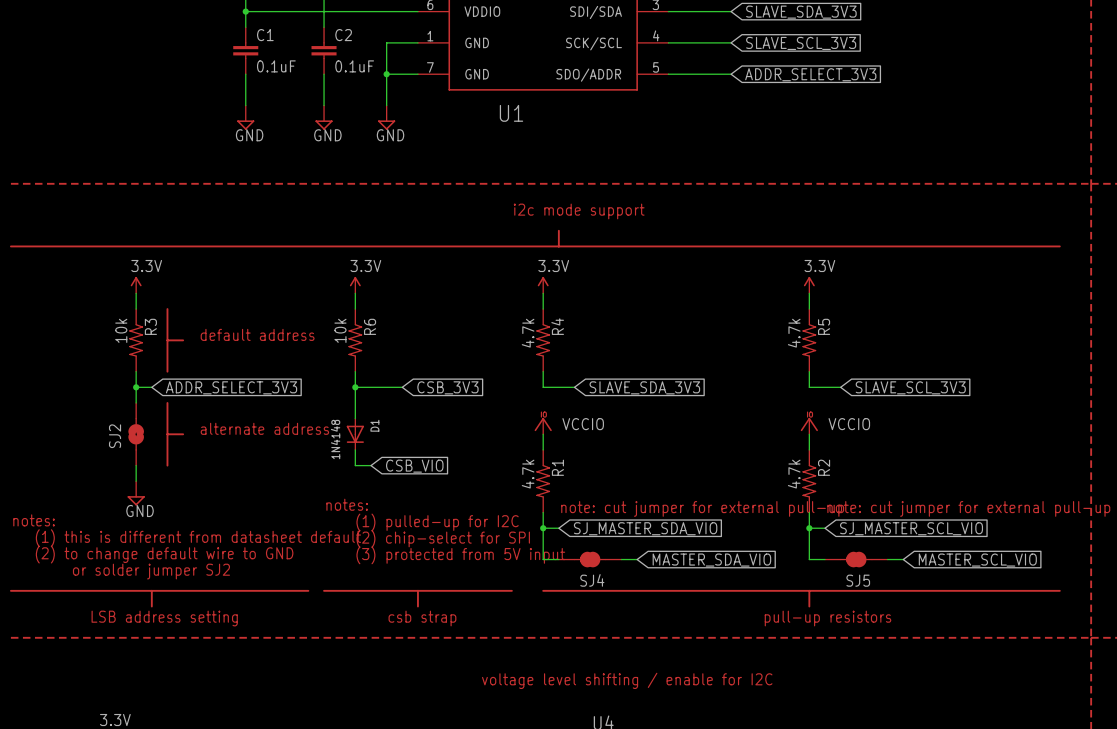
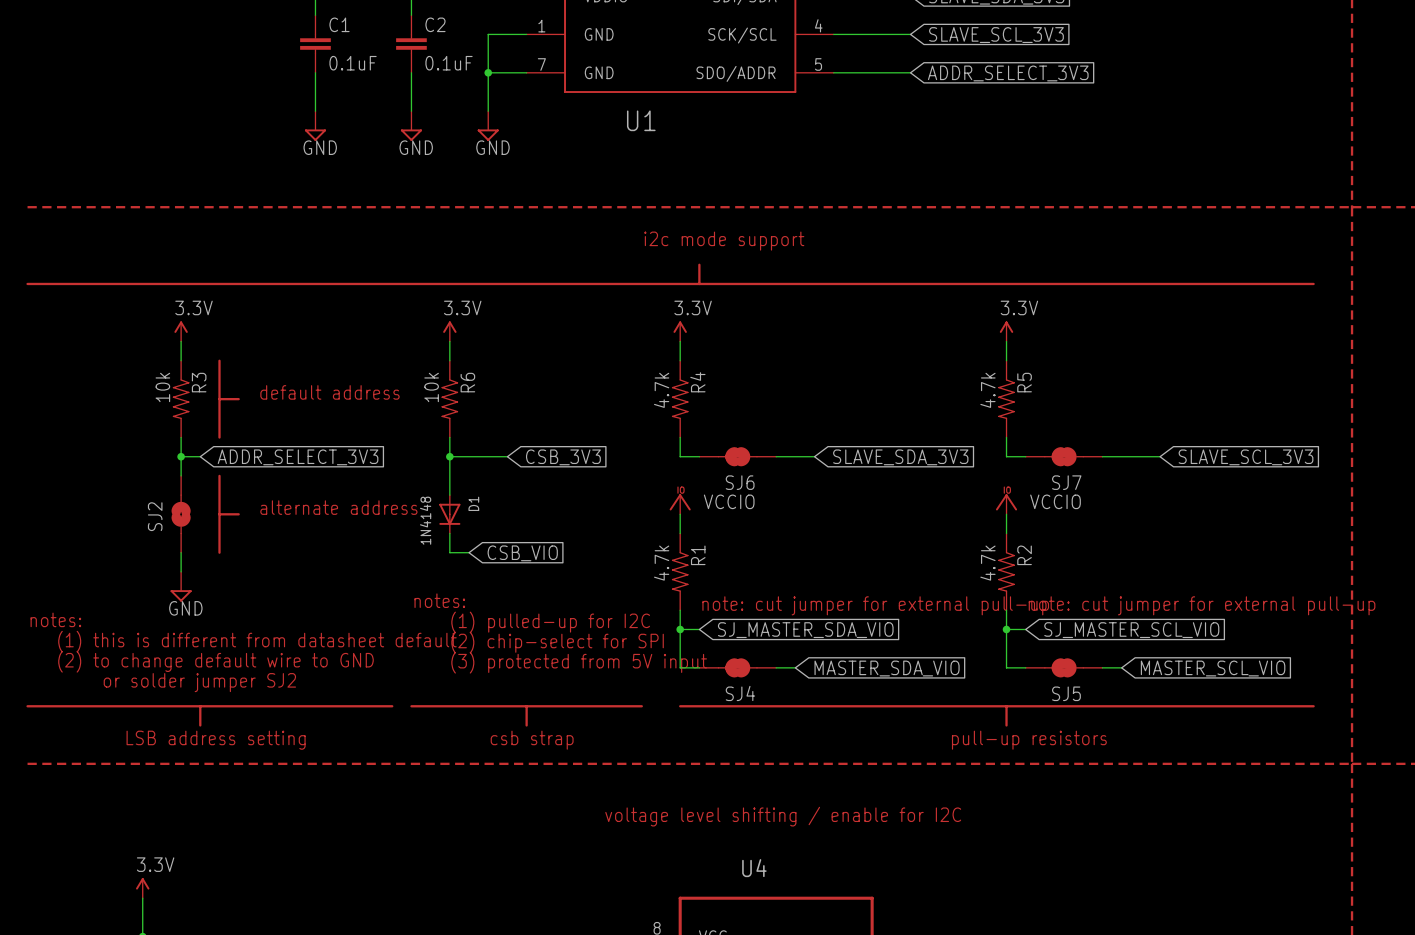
SJ6: none -> (737, 456)
wire: none -> (776, 456) (814, 456)
global label position: SLAVE_SDA_3V3 (644, 387) -> SLAVE_SDA_3V3 (900, 457)
SJ7: none -> (1064, 456)
wire: none -> (1102, 456) (1160, 456)
global label position: SLAVE_SCL_3V3 (910, 387) -> SLAVE_SCL_3V3 (1246, 457)

